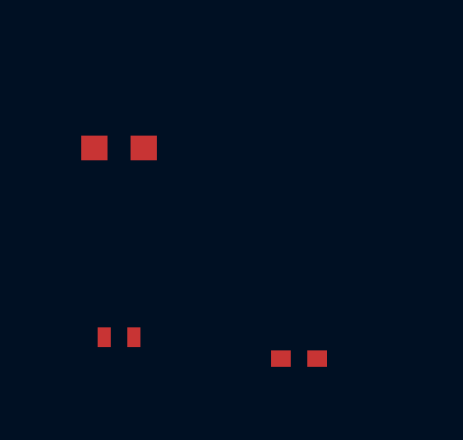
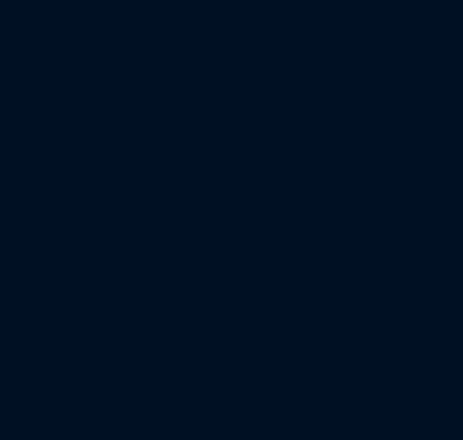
part: (119, 147) -> none
part: (119, 337) -> none
part: (299, 358) -> none

